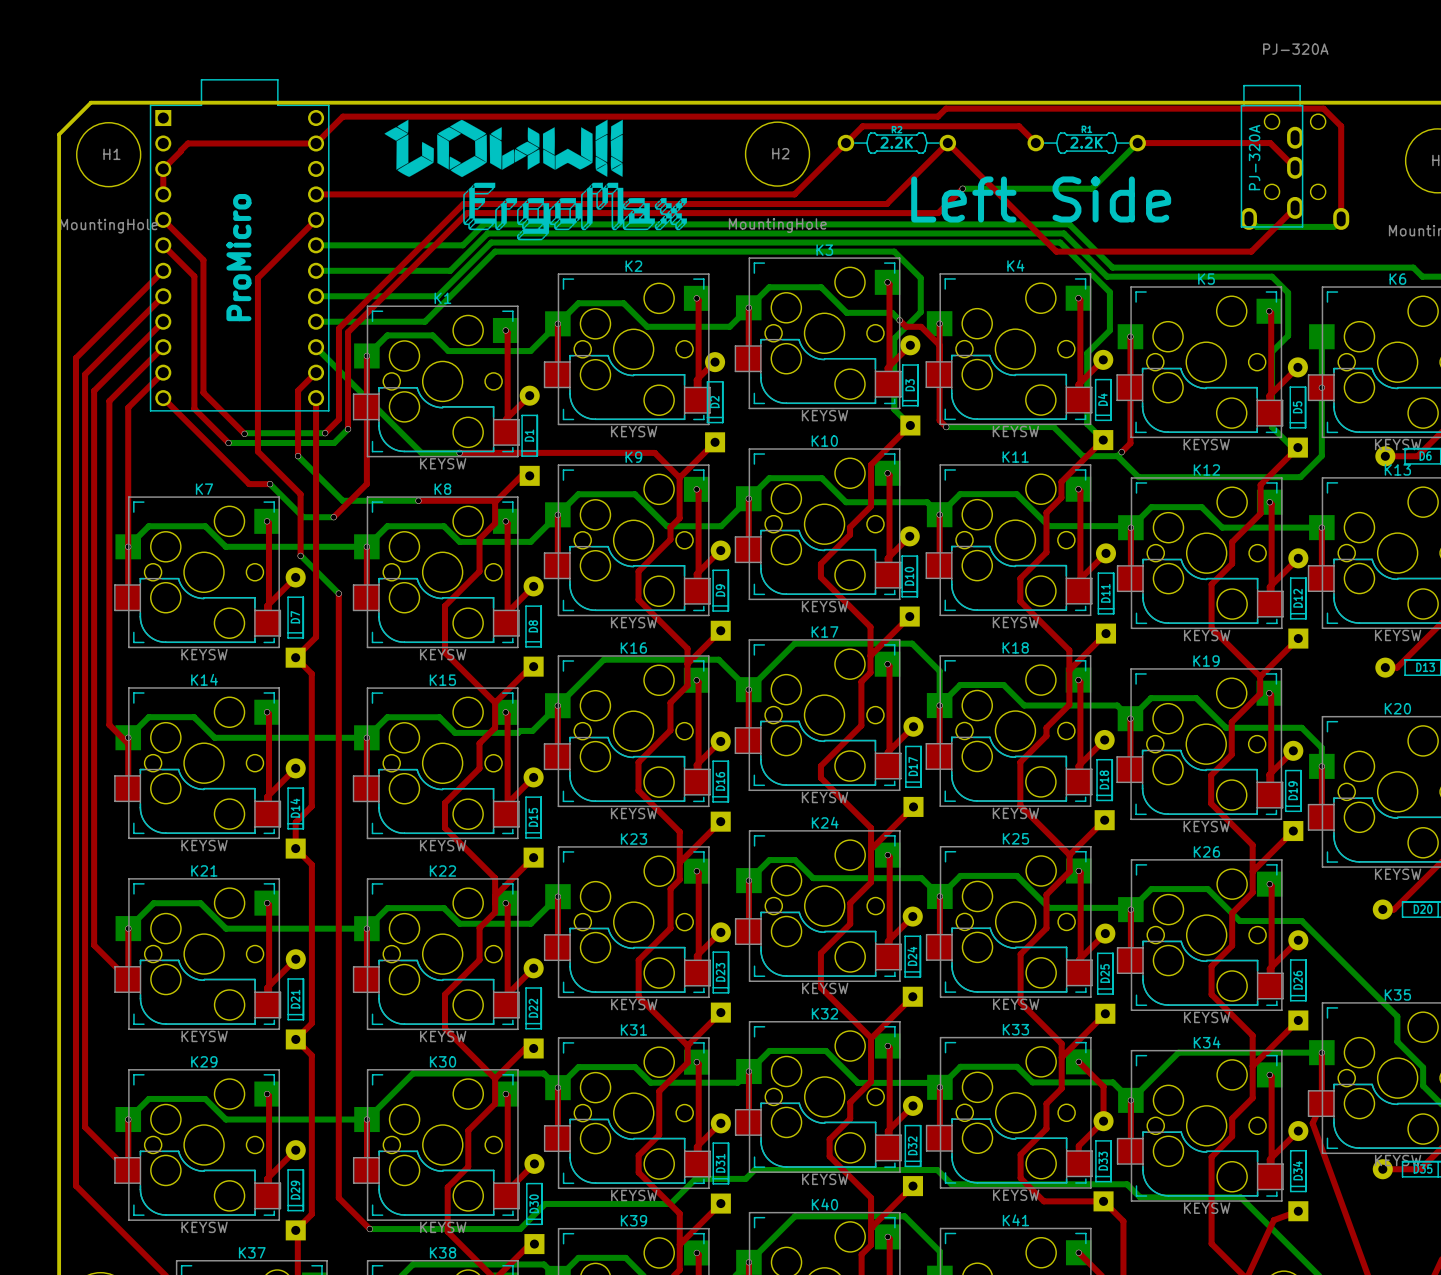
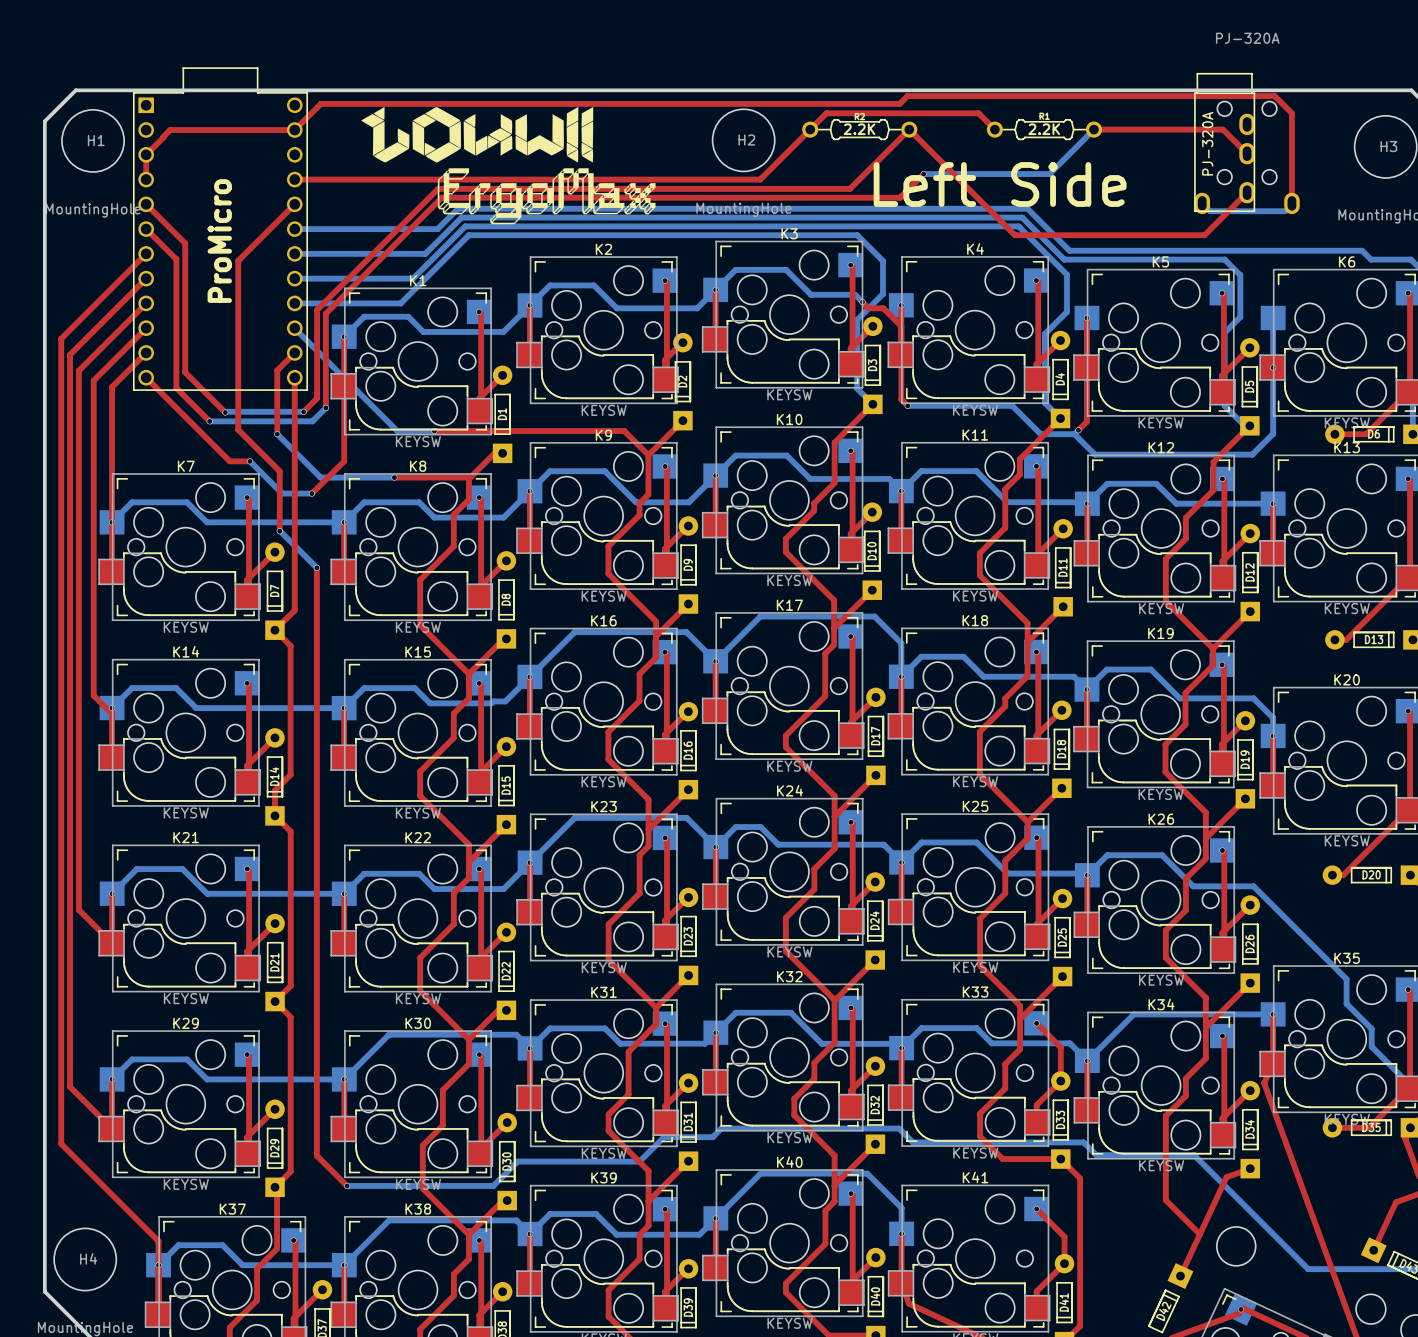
bottom track: none -> (715, 847) (686, 817) (574, 817) (530, 862)

